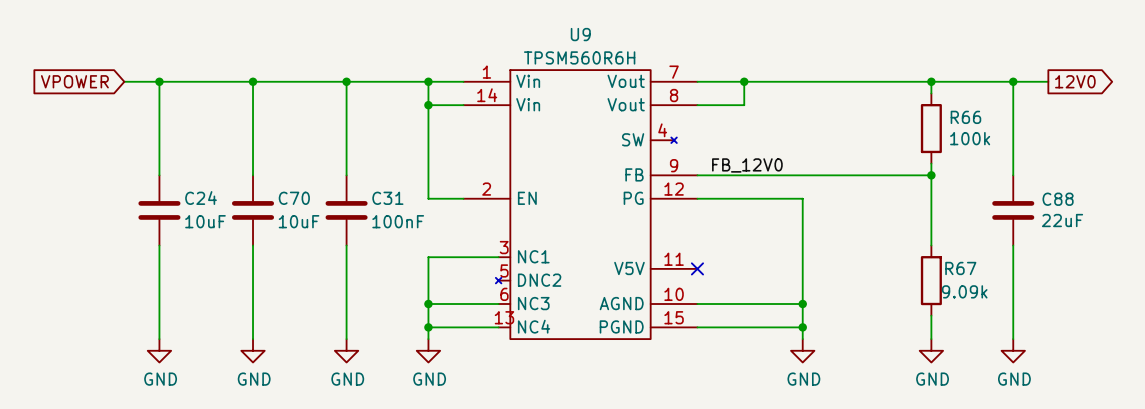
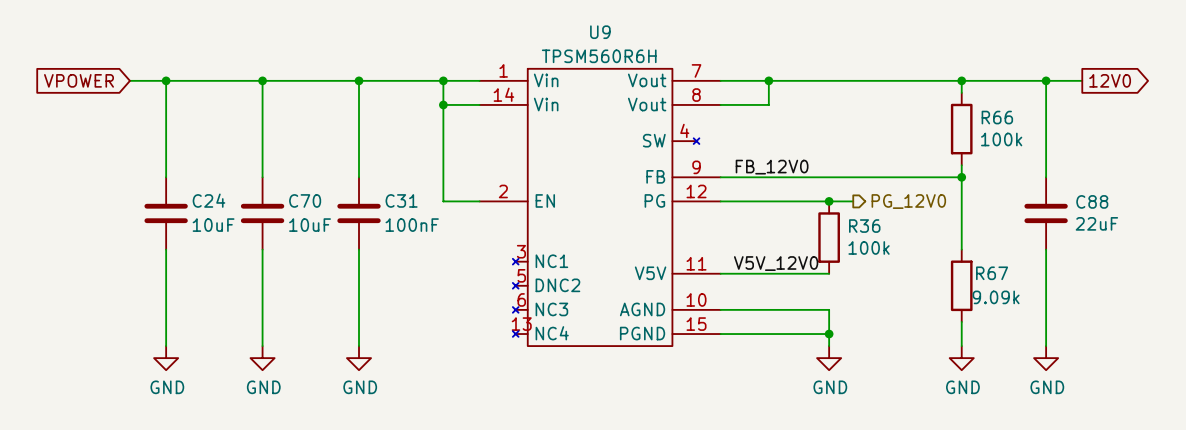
U9 symbol: [463, 69, 734, 340] -> [479, 68, 758, 347]
wire: (802, 198) (802, 304) -> (829, 201) (853, 201)
junction: none -> (829, 201)
hierarchical label: none -> PG_12V0 (908, 201)
R36: none -> 100k (829, 237)
wire: (498, 257) (428, 257) (428, 339) -> none
label: none -> V5V_12V0 (776, 263)
wire: none -> (720, 273) (829, 273)
no-connect mark: (697, 268) -> none
wire: (428, 304) (498, 304) -> none
junction: (428, 304) -> none
junction: (802, 304) -> none
wire: (428, 327) (498, 327) -> none
junction: (428, 327) -> none
power symbol: GND (428, 350) -> none

